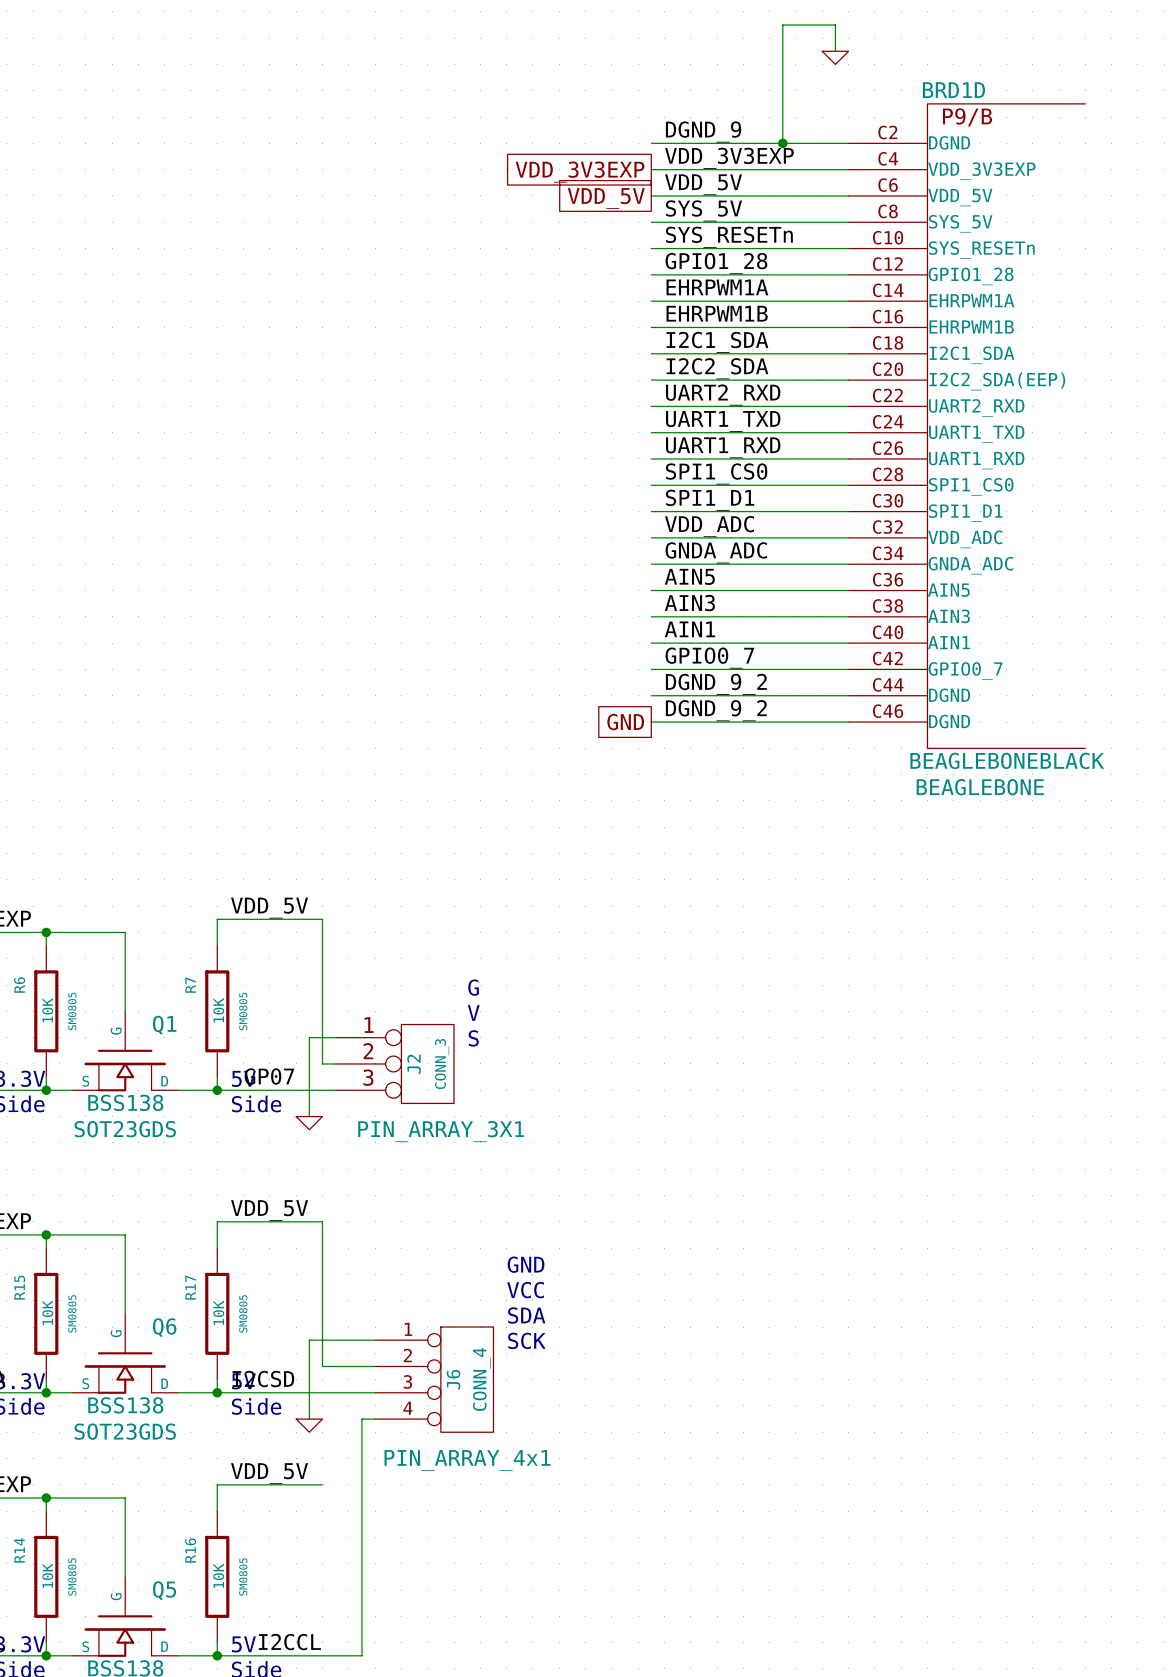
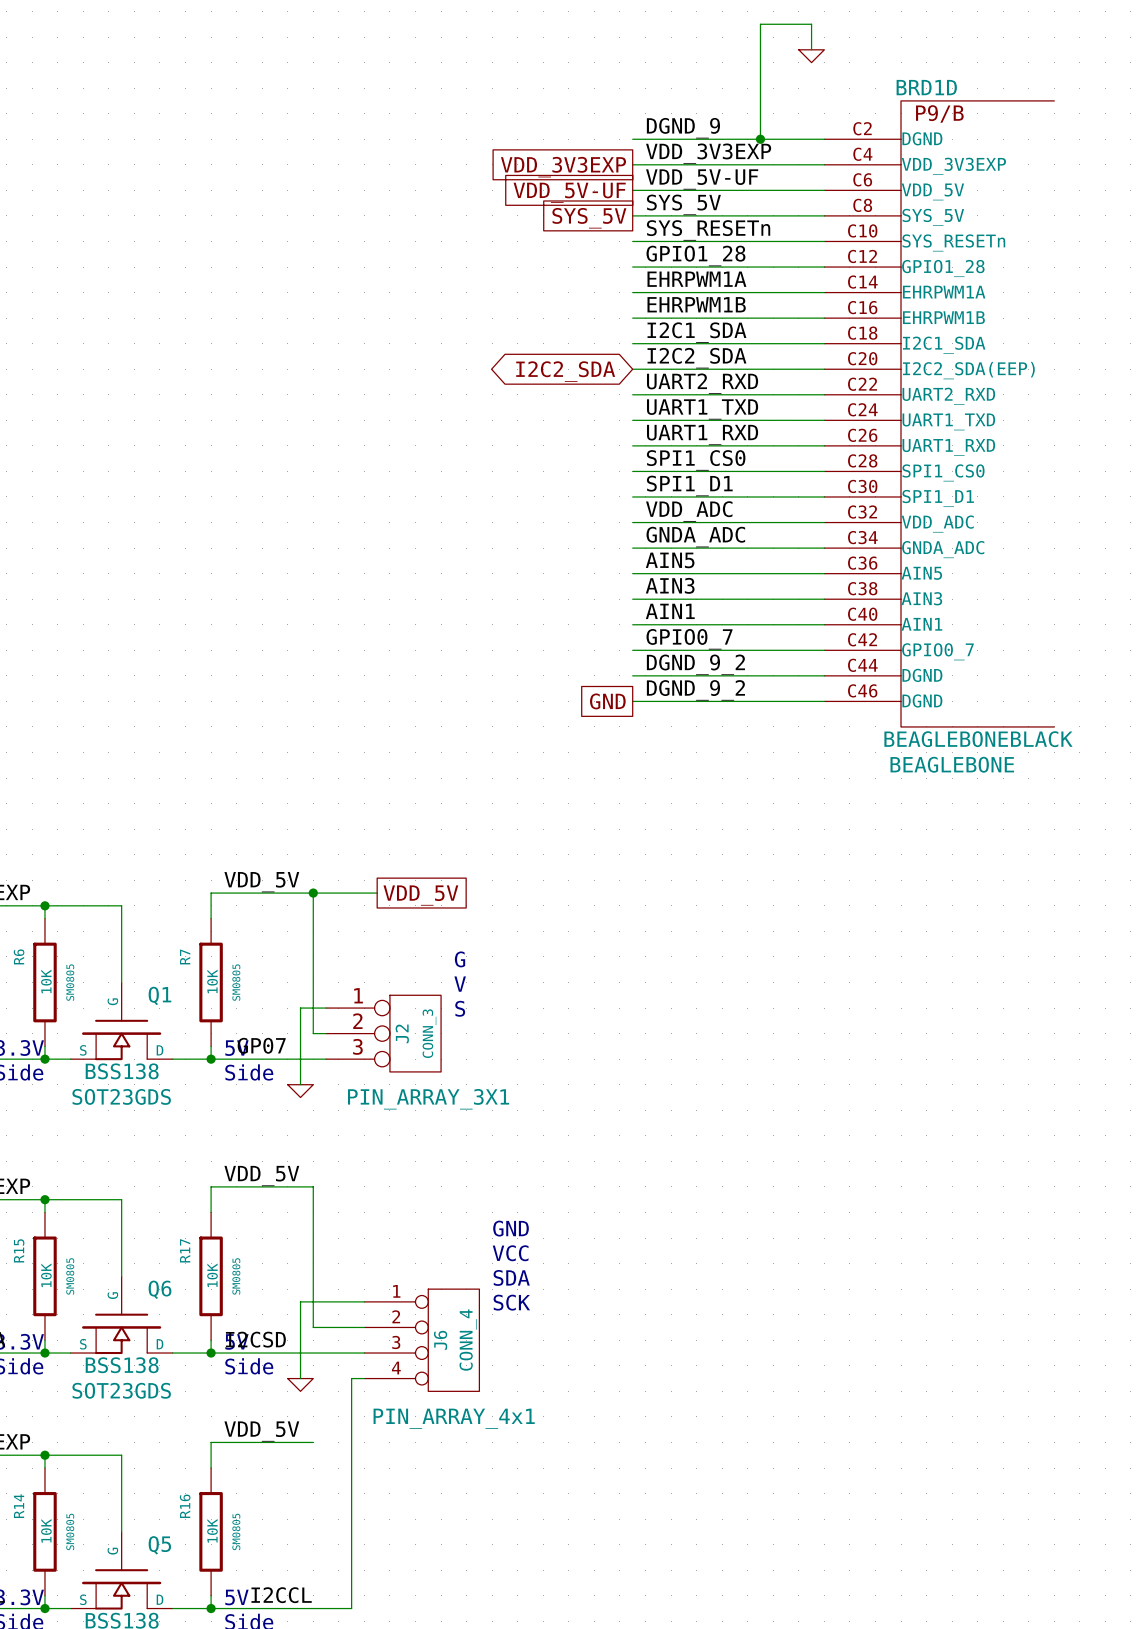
label: VDD_5V (703, 184) -> VDD_5V-UF (702, 179)
global label: VDD_5V (606, 198) -> VDD_5V-UF (569, 192)
global label: none -> SYS_5V (589, 218)
global label: none -> I2C2_SDA (565, 371)
wire: none -> (313, 893) (377, 893)
junction: none -> (313, 893)
global label: none -> VDD_5V (420, 895)

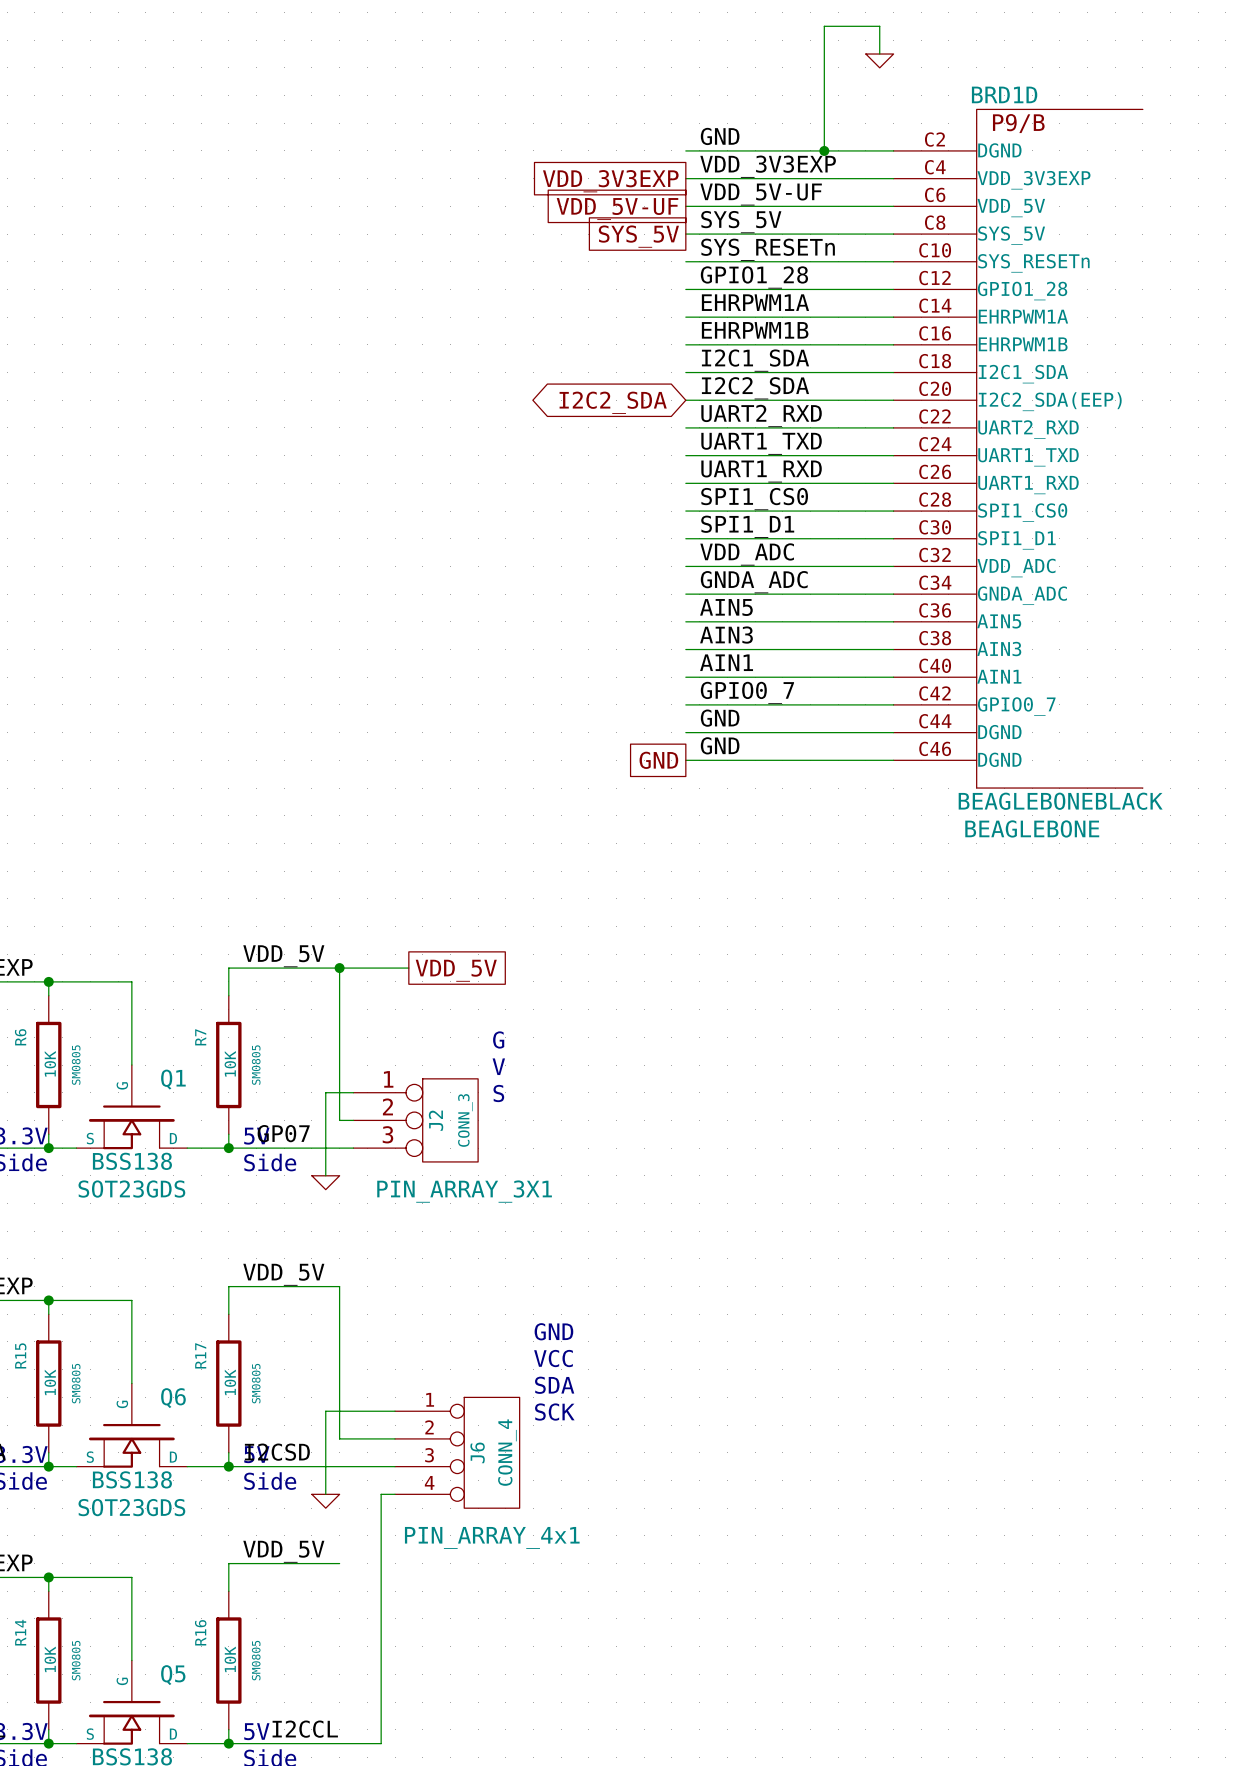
label: DGND_9 (683, 128) -> GND (720, 136)
label: DGND_9_2 (695, 664) -> GND (720, 718)
label: DGND_9_2 (695, 690) -> GND (720, 745)

